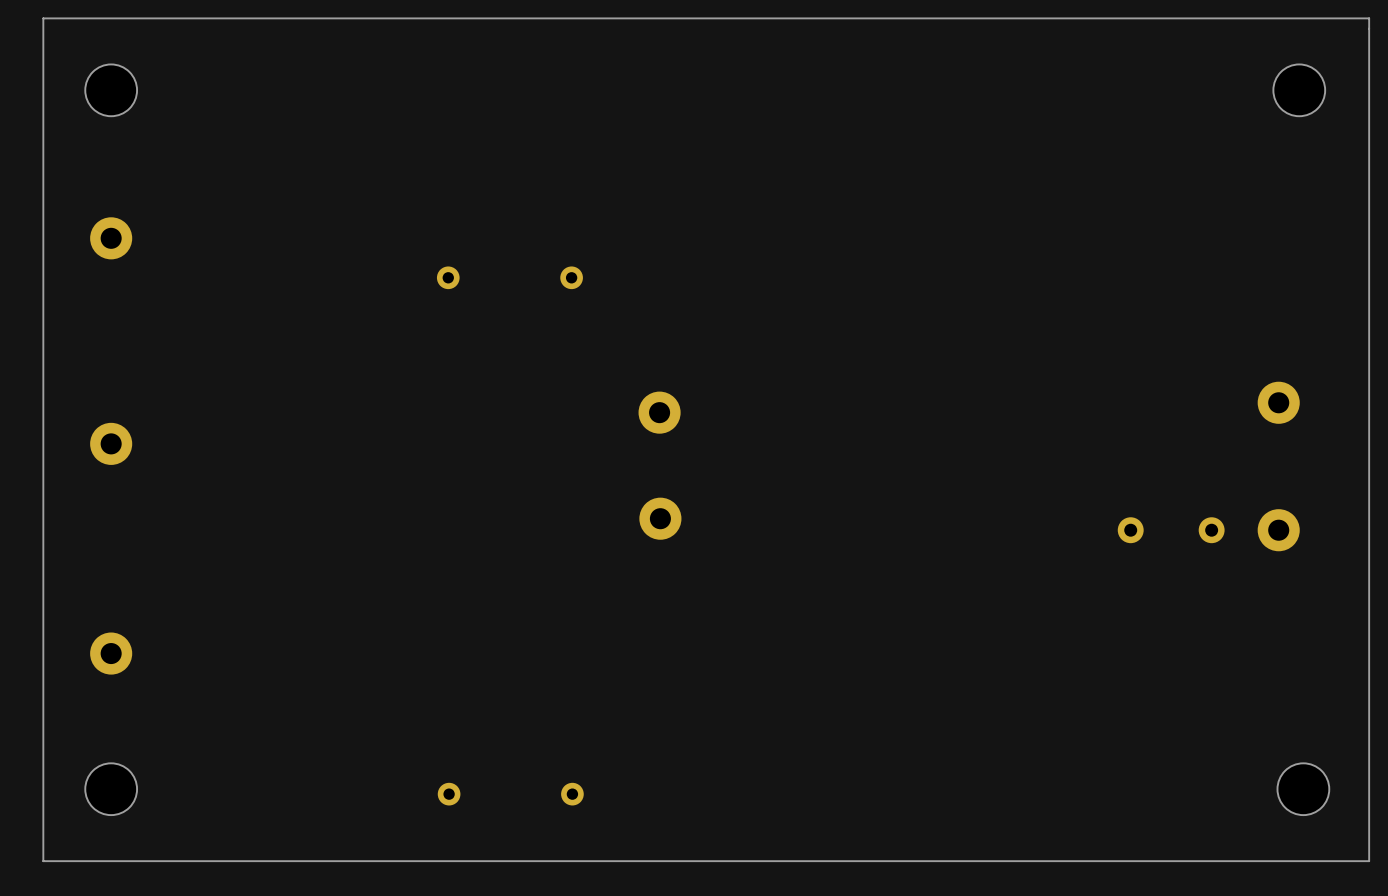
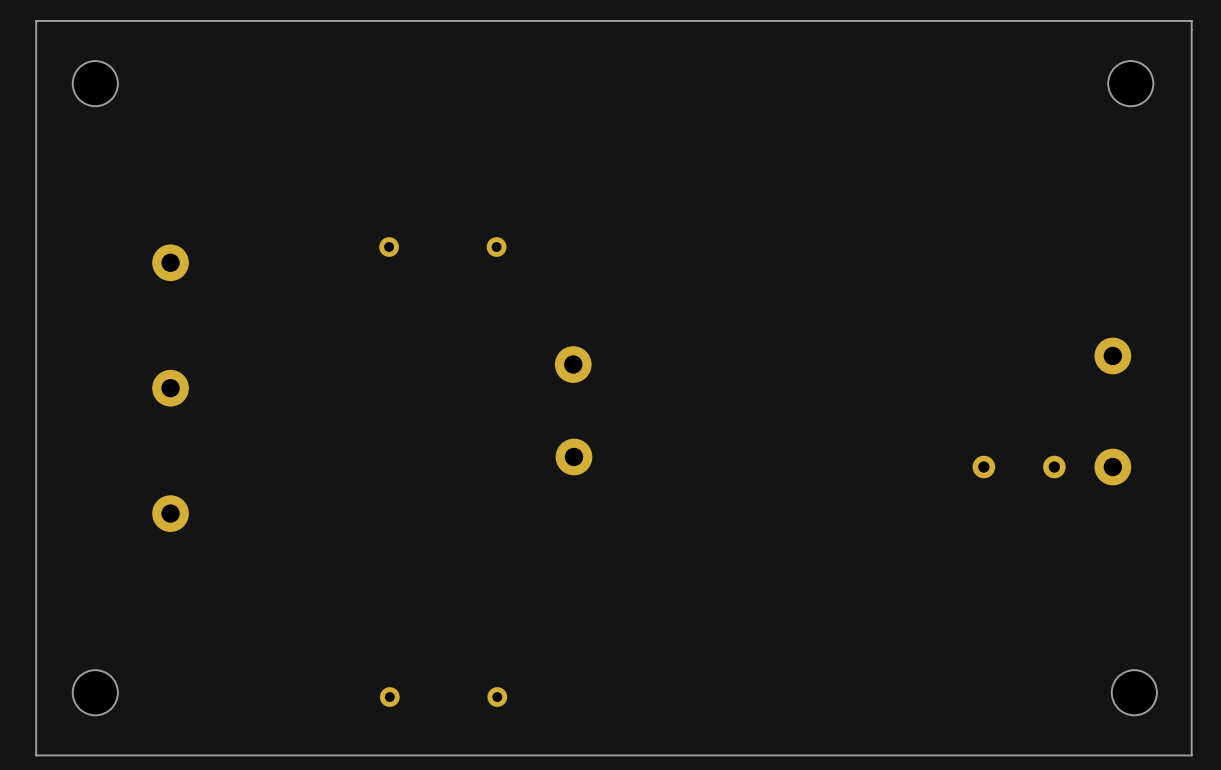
part: (111, 238) -> none
part: none -> (170, 262)
part: none -> (170, 388)
part: (111, 443) -> none
part: none -> (170, 513)
part: (111, 653) -> none

